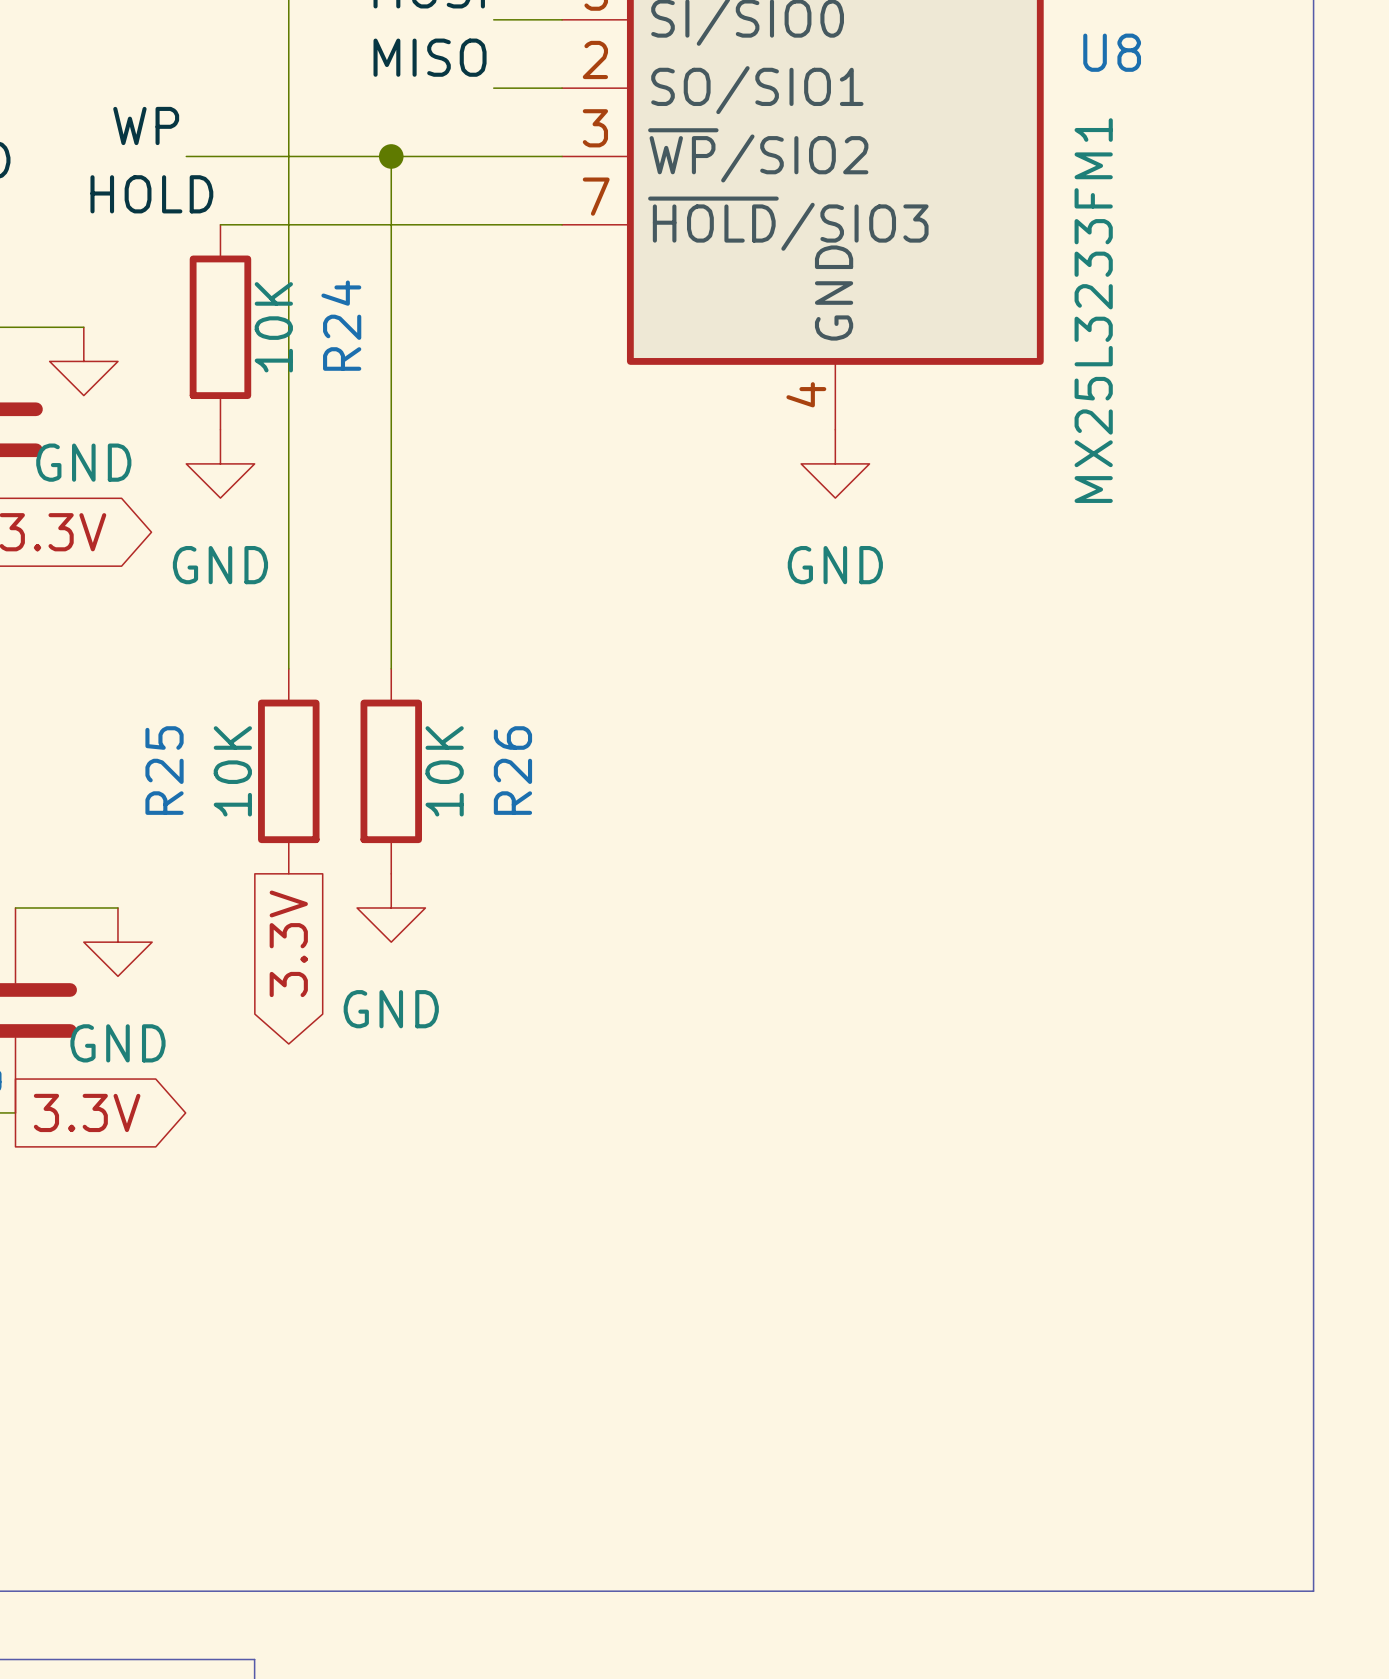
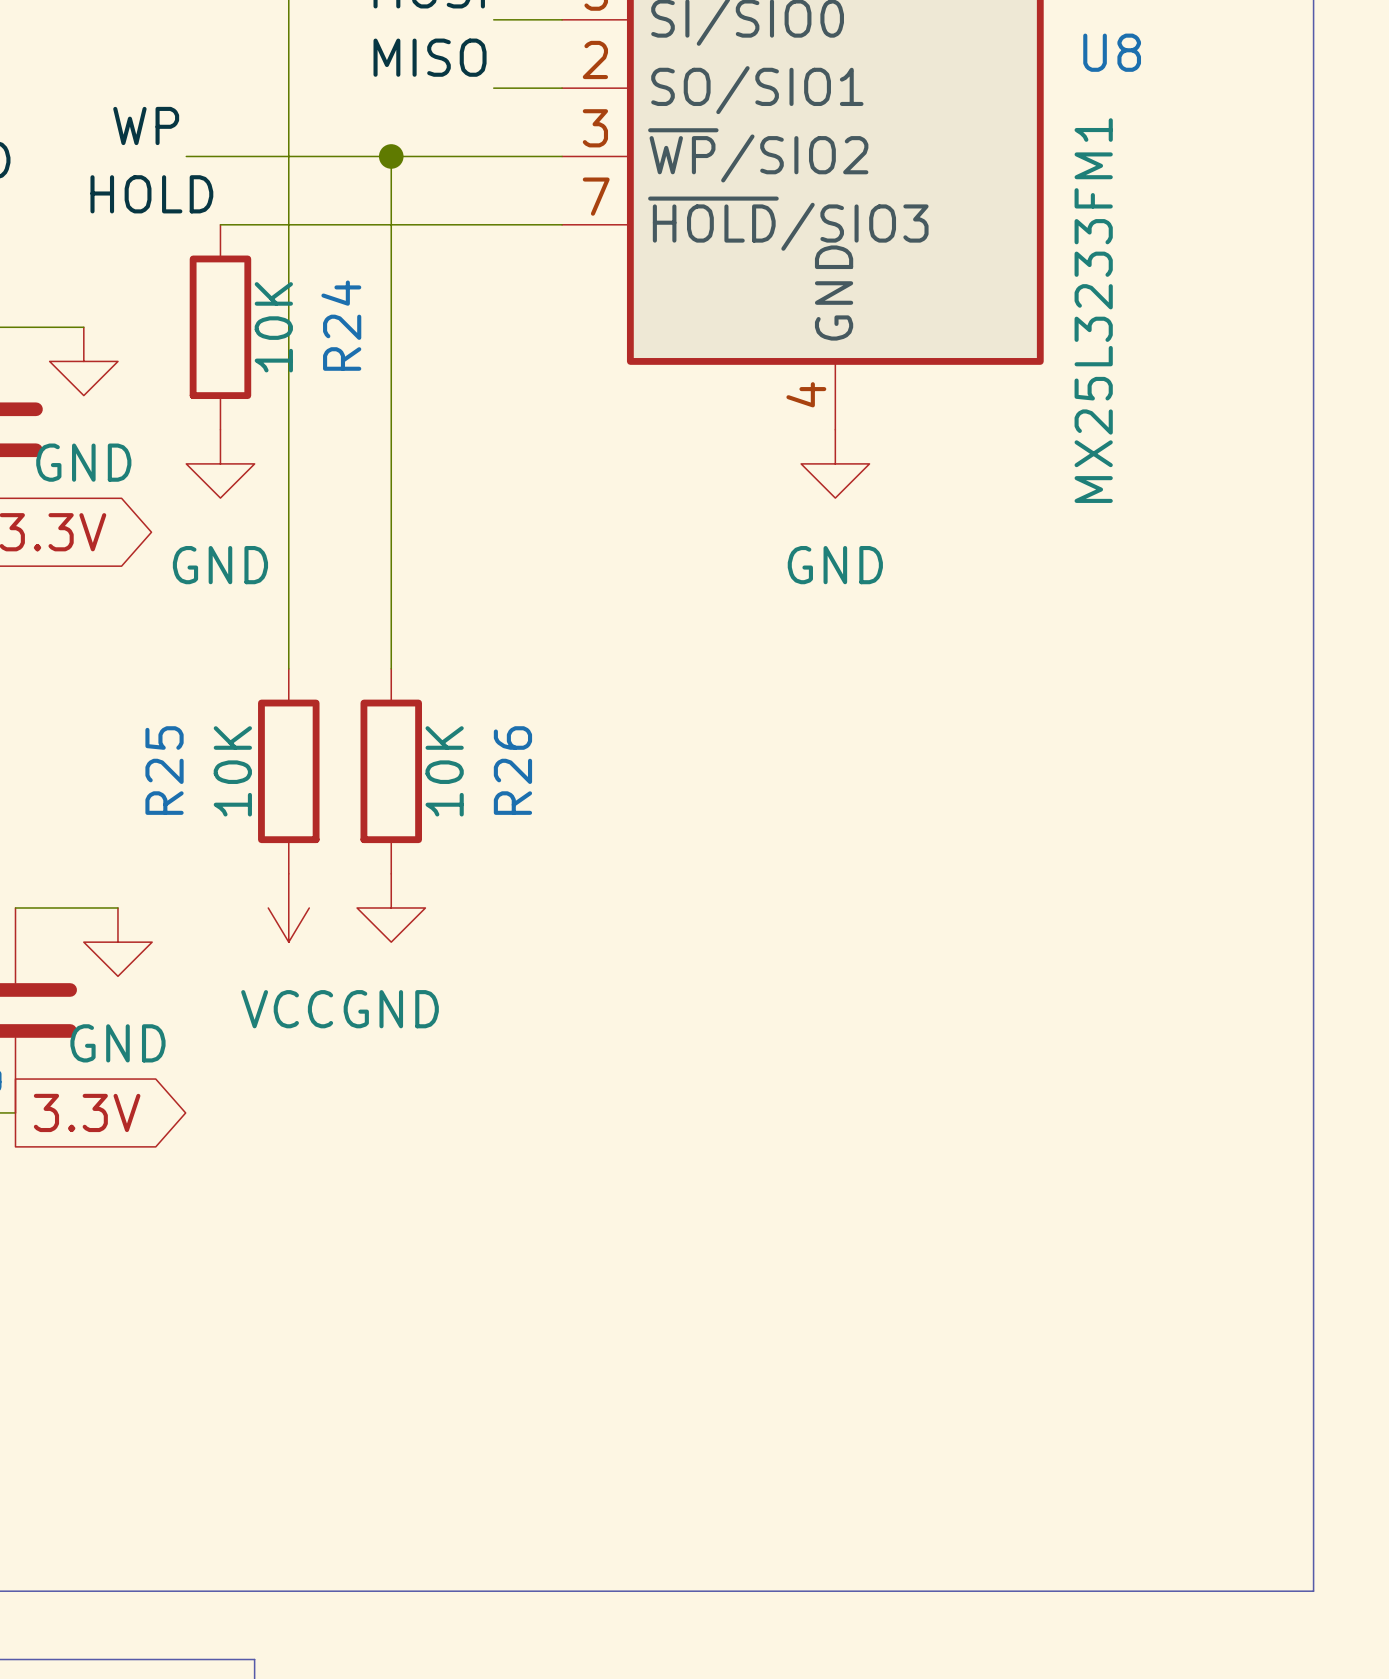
power symbol: none -> VCC (288, 907)
global label: 3.3V (288, 943) -> none

